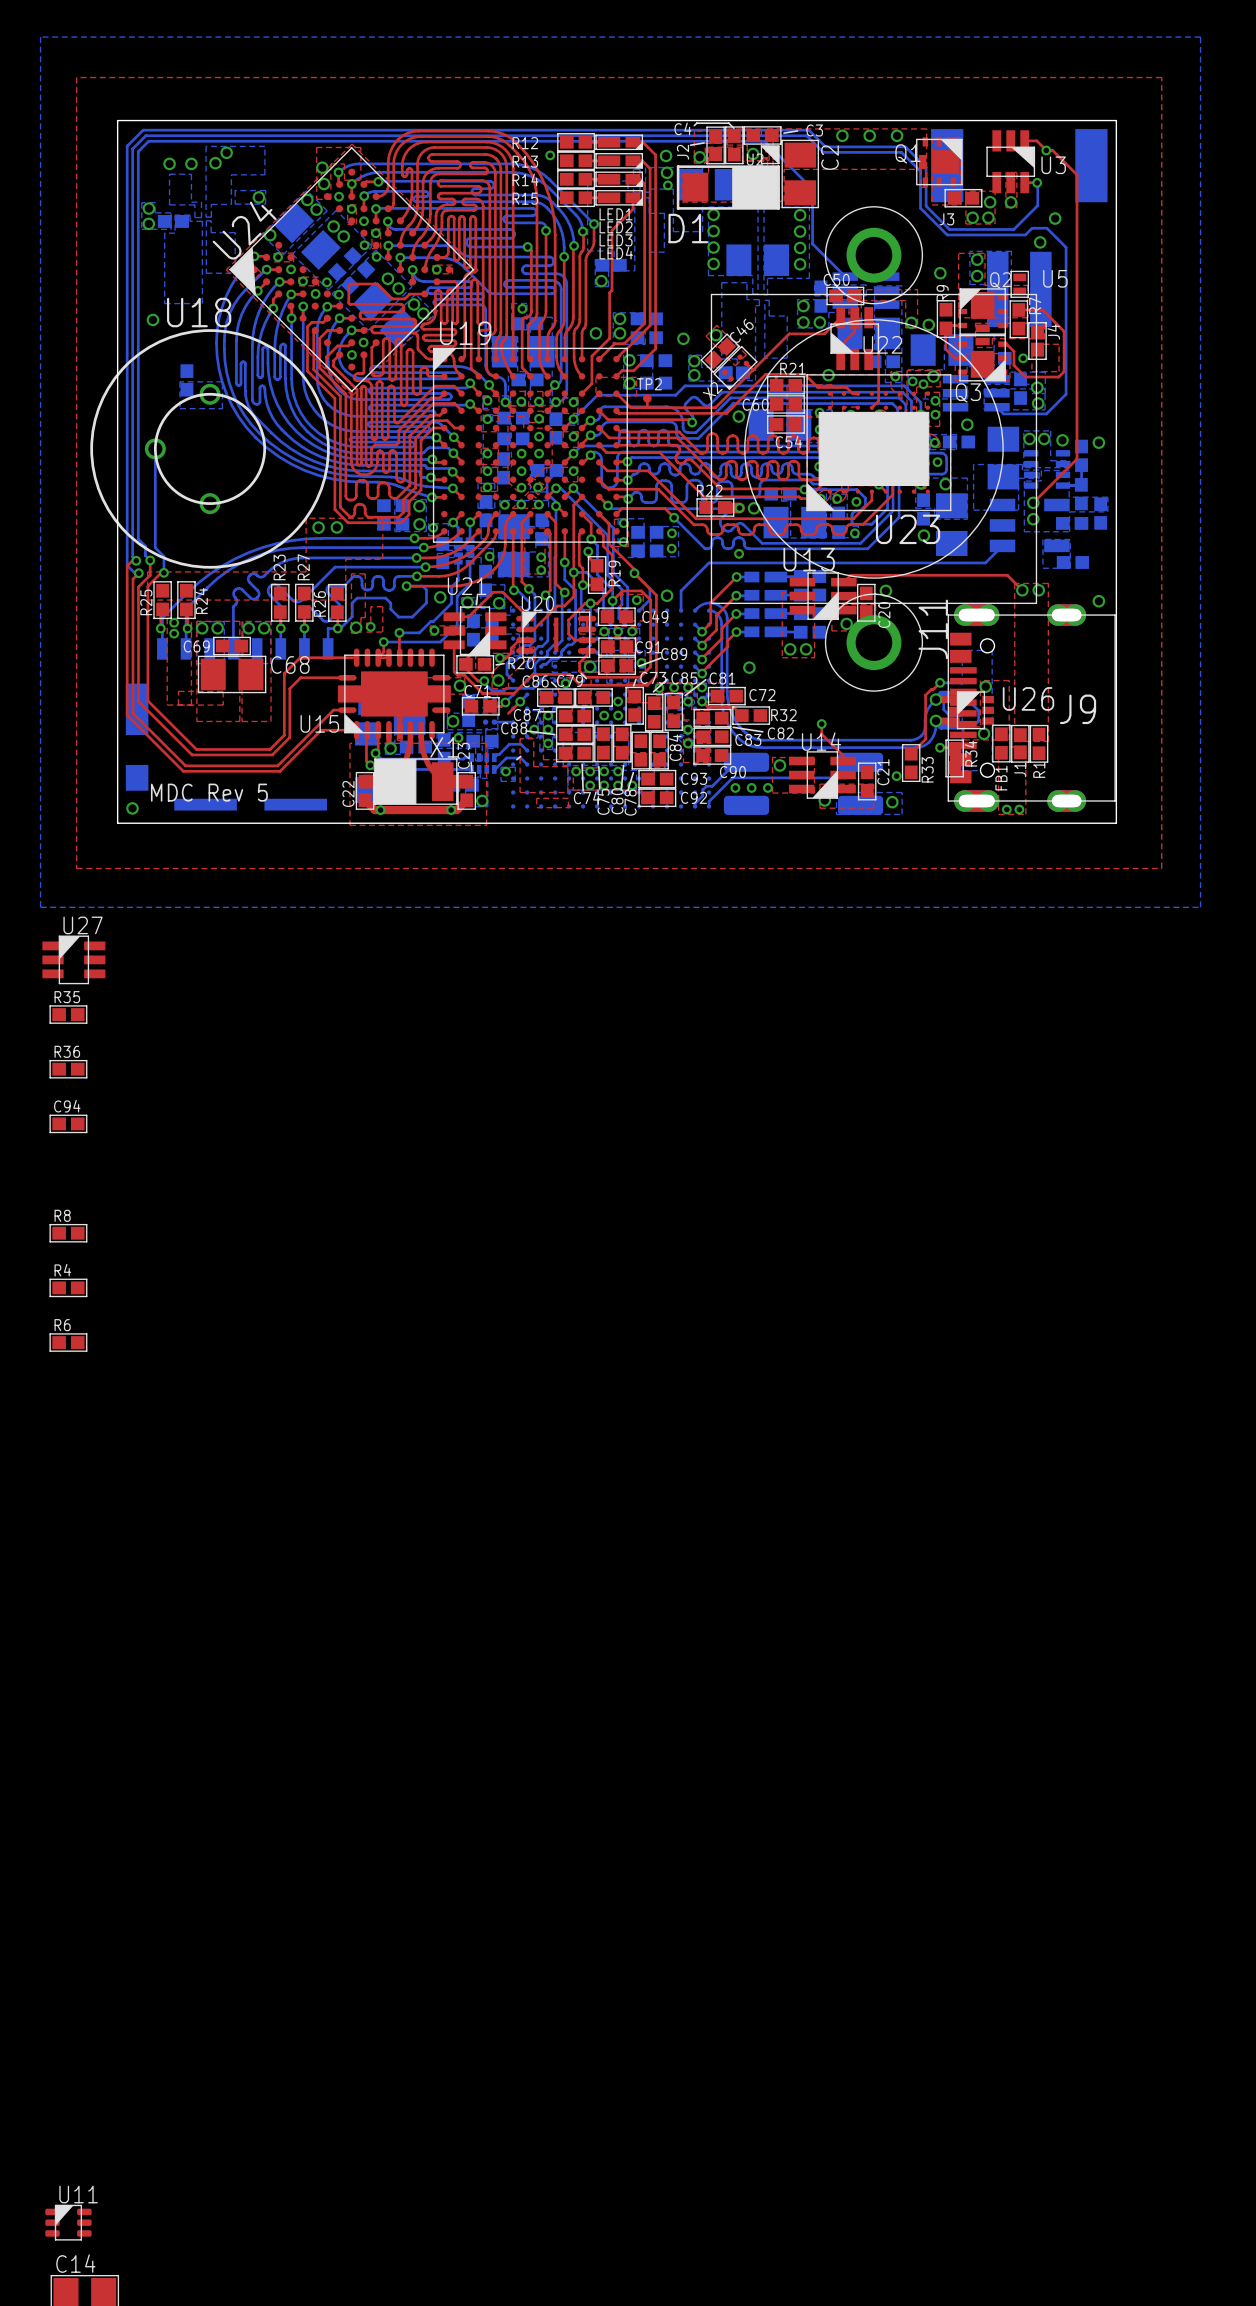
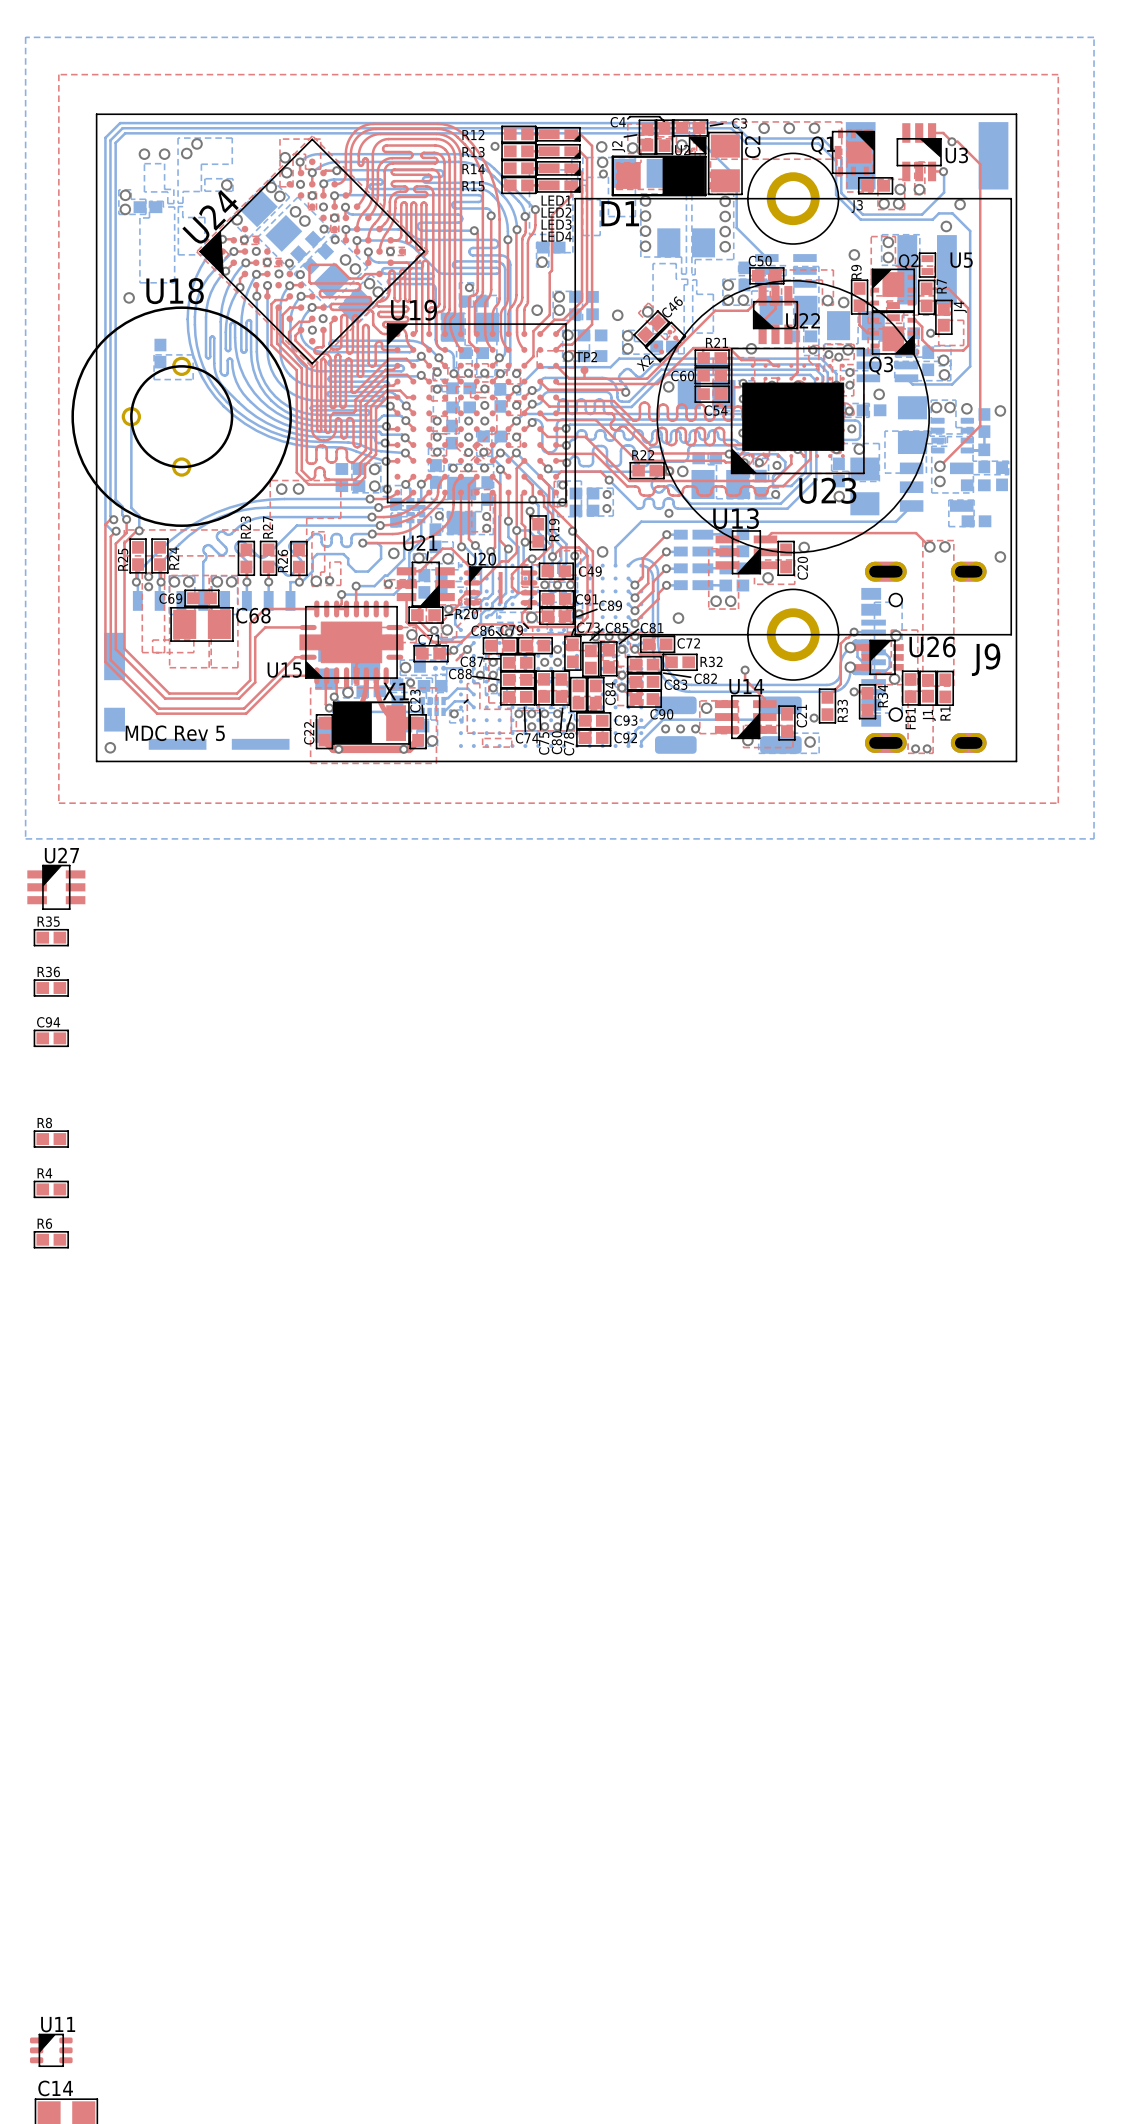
J9 footprint: [710, 206, 1037, 692] -> [574, 152, 1012, 681]
J11 side: top (1031, 708) -> bottom (923, 657)

